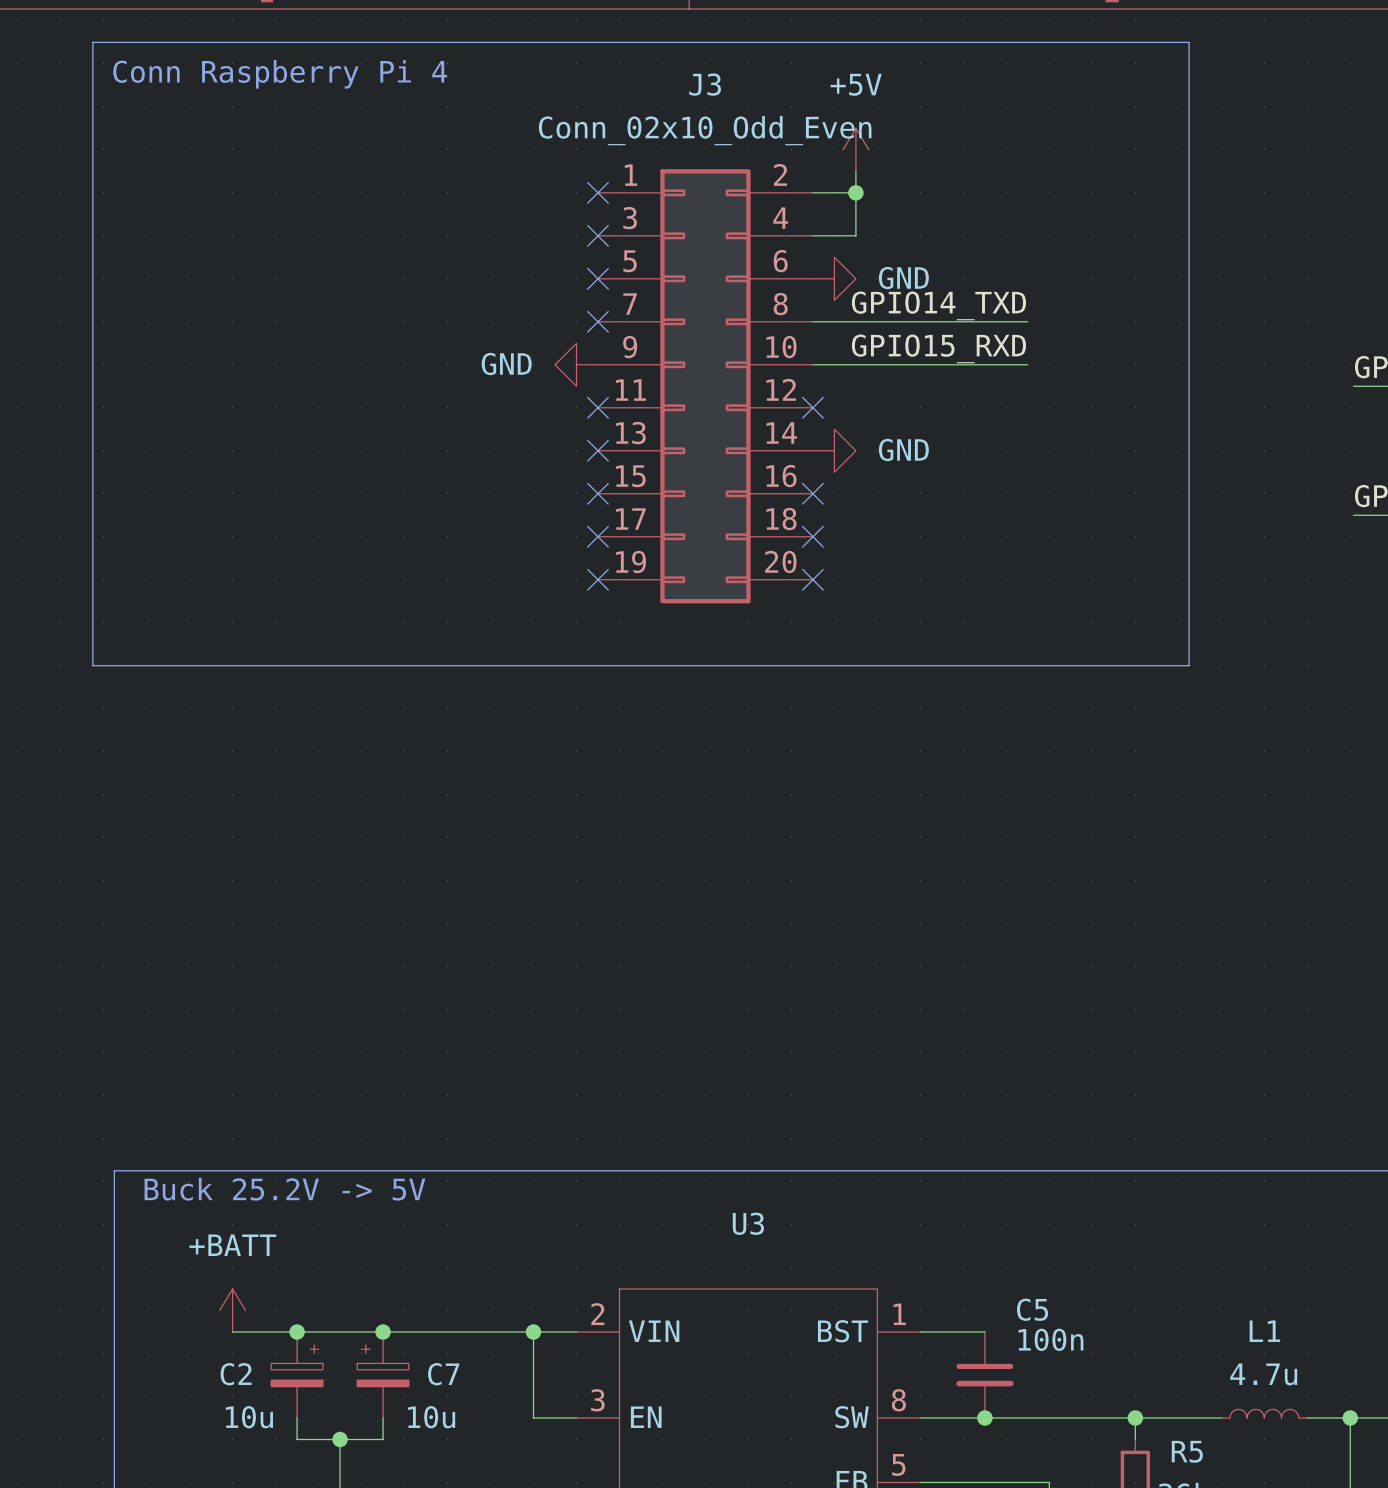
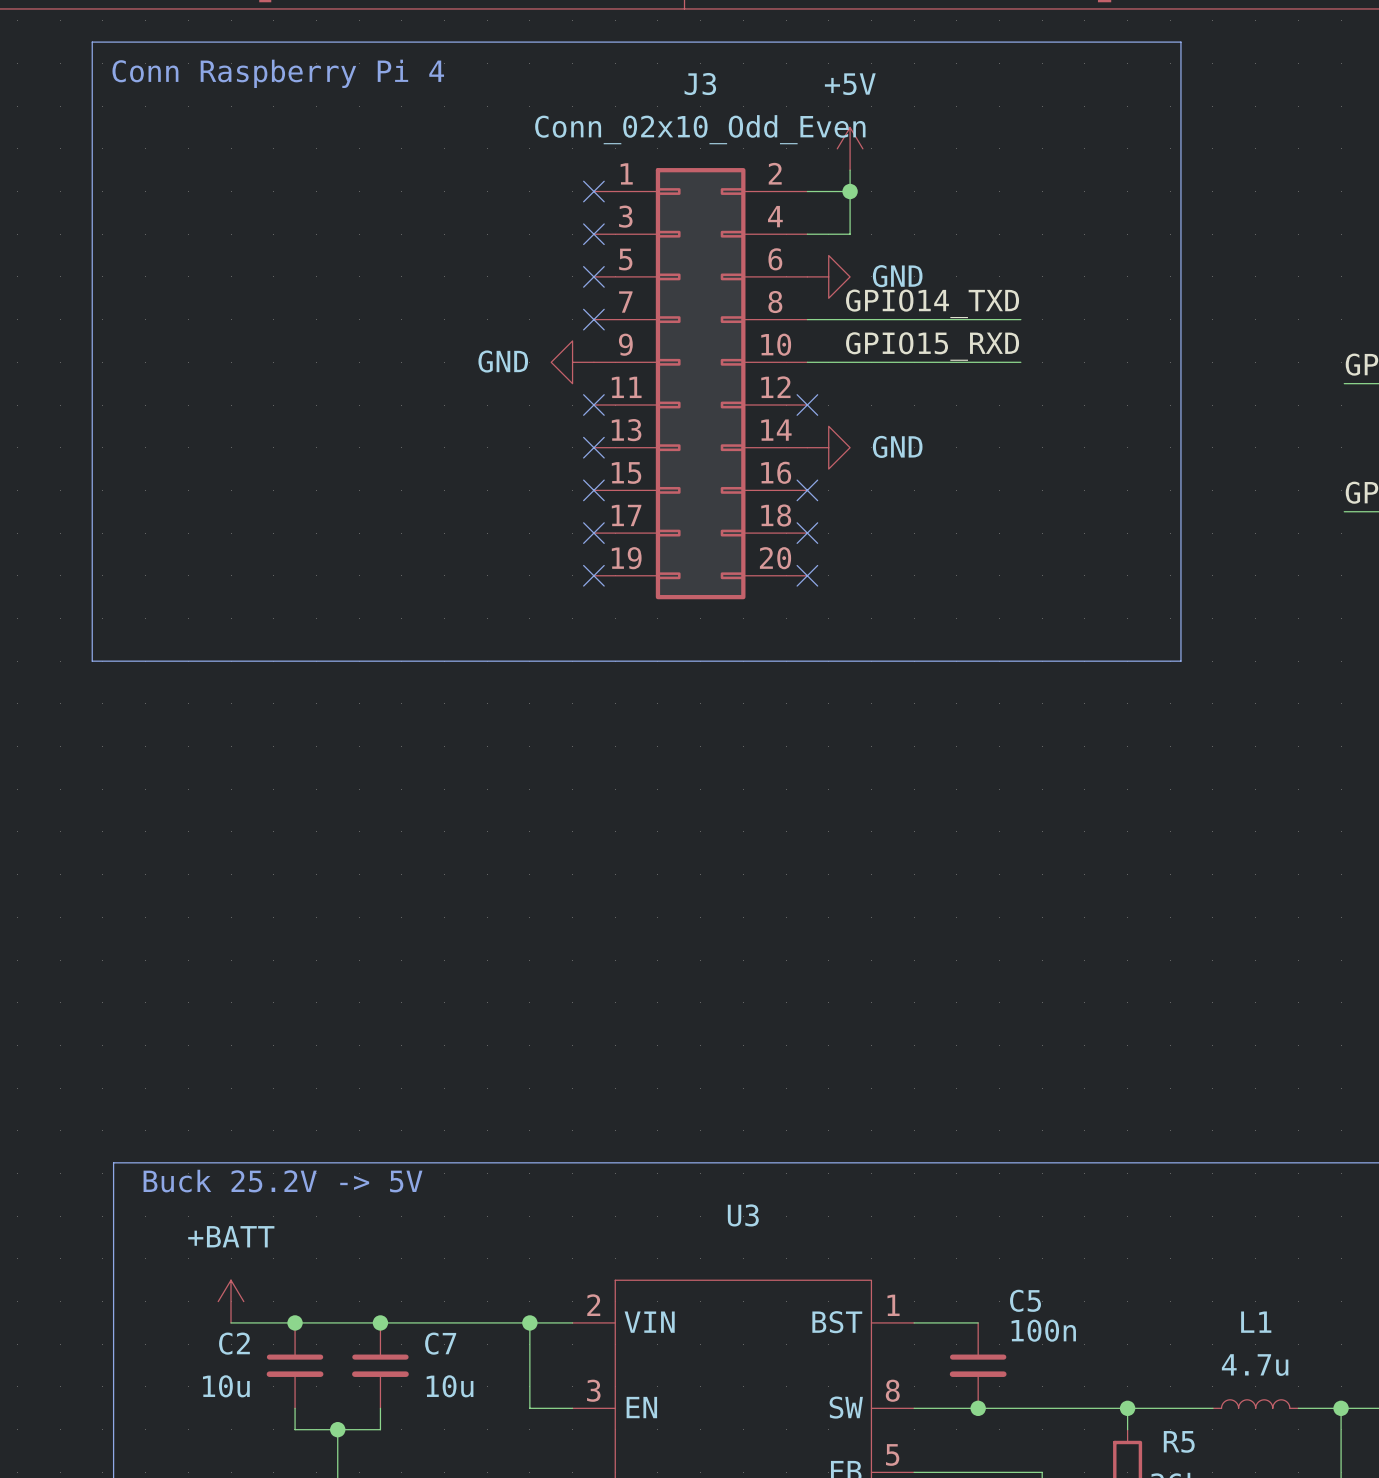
C2 symbol: [271, 1332, 323, 1419] -> [266, 1322, 324, 1409]
C7 symbol: [357, 1332, 409, 1419] -> [352, 1322, 409, 1409]

